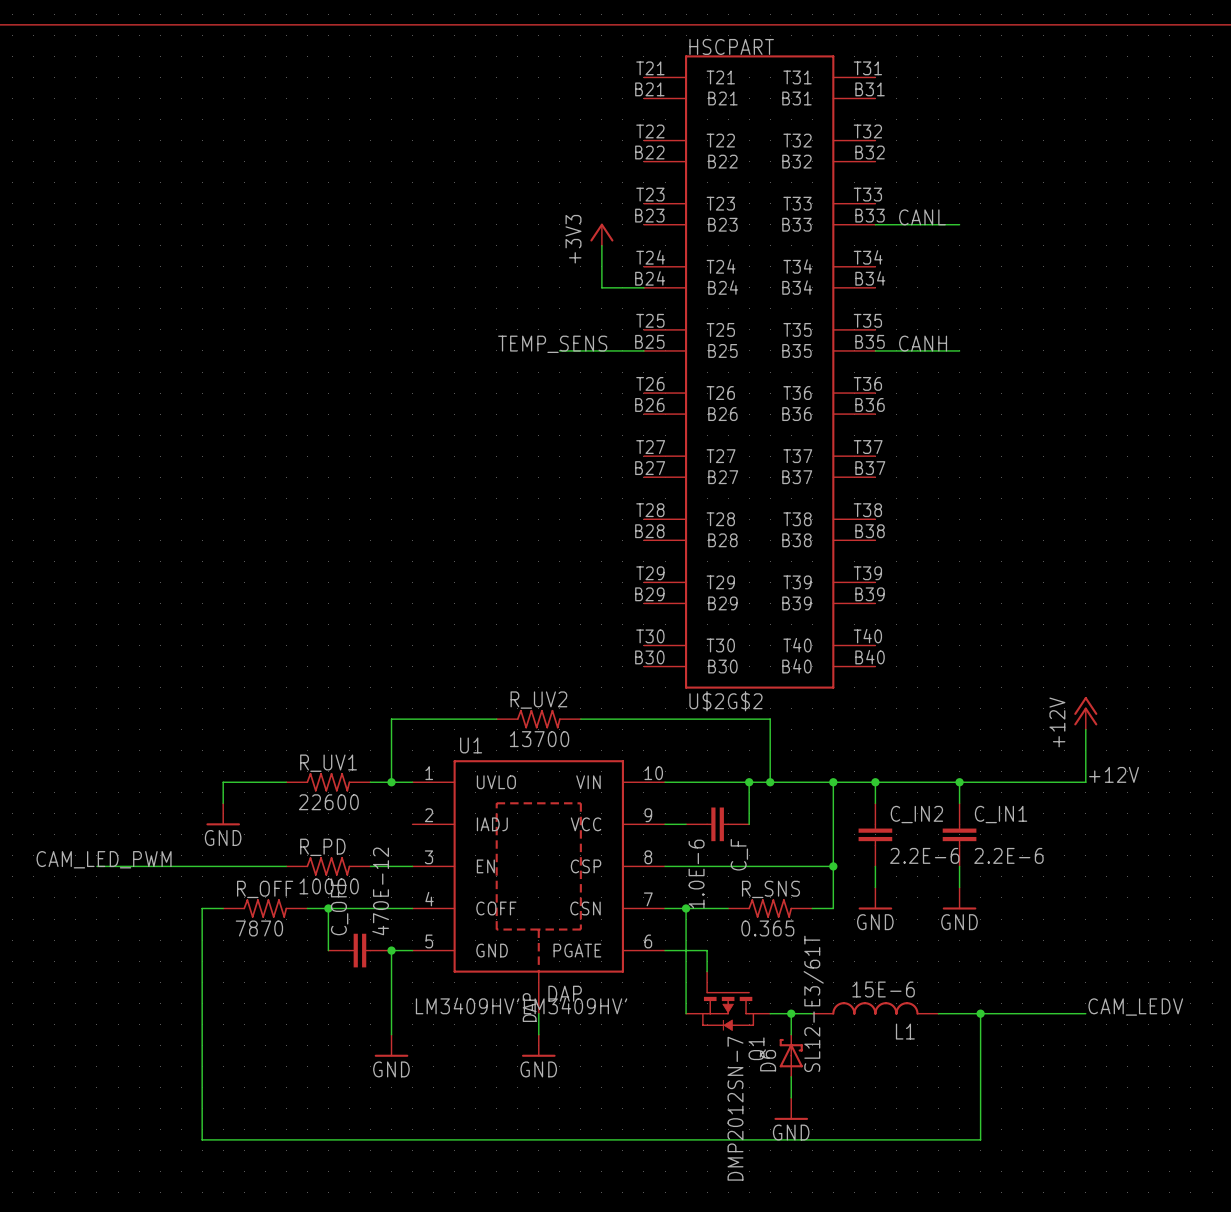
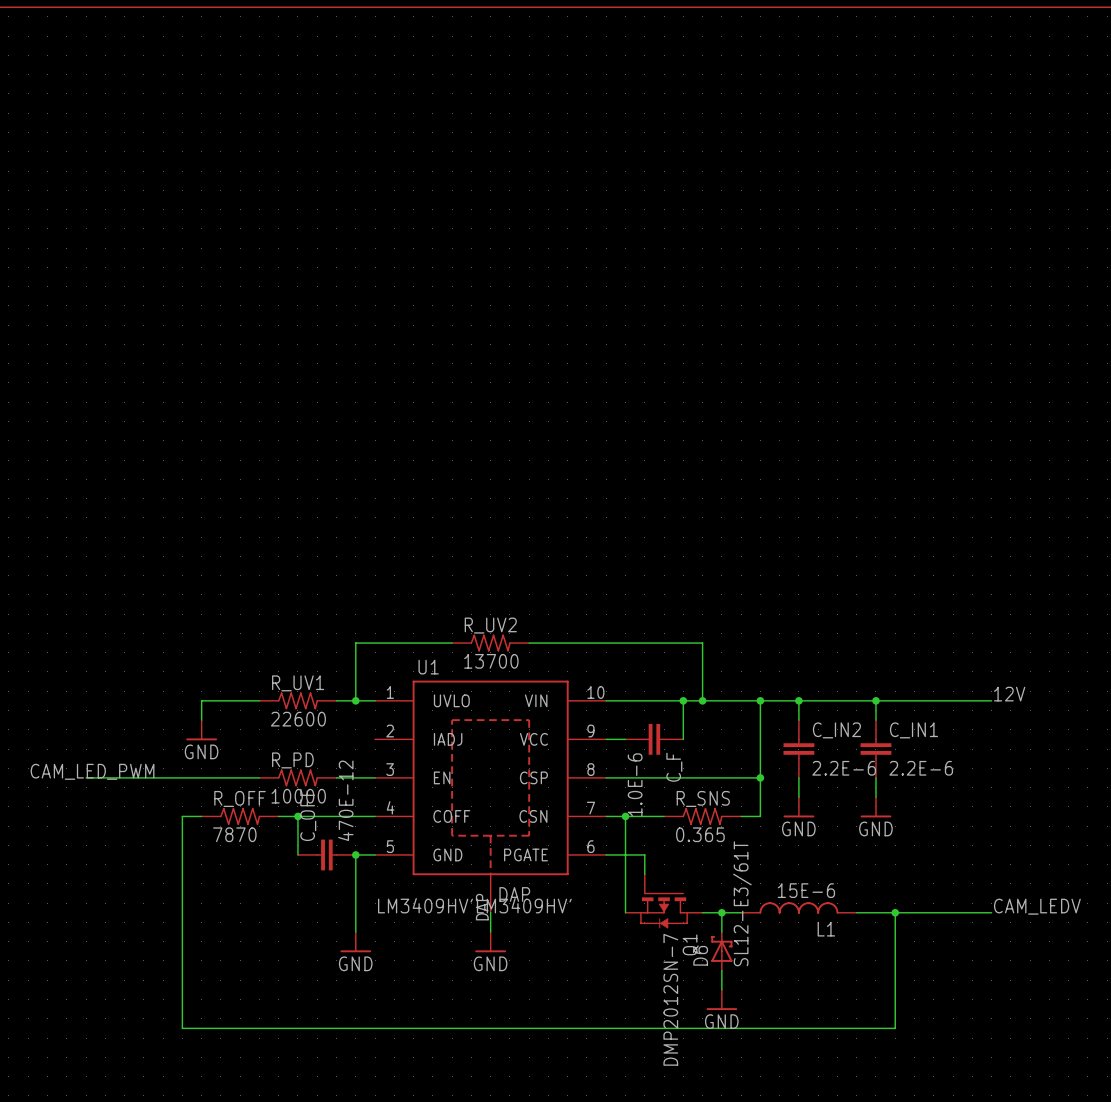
label: CANL (922, 217) -> none
wire: (875, 224) (959, 224) -> none
power symbol: +3V3 (601, 234) -> none
wire: (601, 245) (601, 287) (643, 287) -> none
label: CANH (923, 343) -> none
label: TEMP_SENS (552, 344) -> none
wire: (559, 350) (643, 350) -> none
wire: (875, 350) (959, 350) -> none
U$2G$2: HSCPART (759, 372) -> none
power symbol: +12V (1085, 713) -> none
wire: (1085, 729) (1085, 782) -> none
label: +12V (1114, 774) -> 12V (1009, 694)

